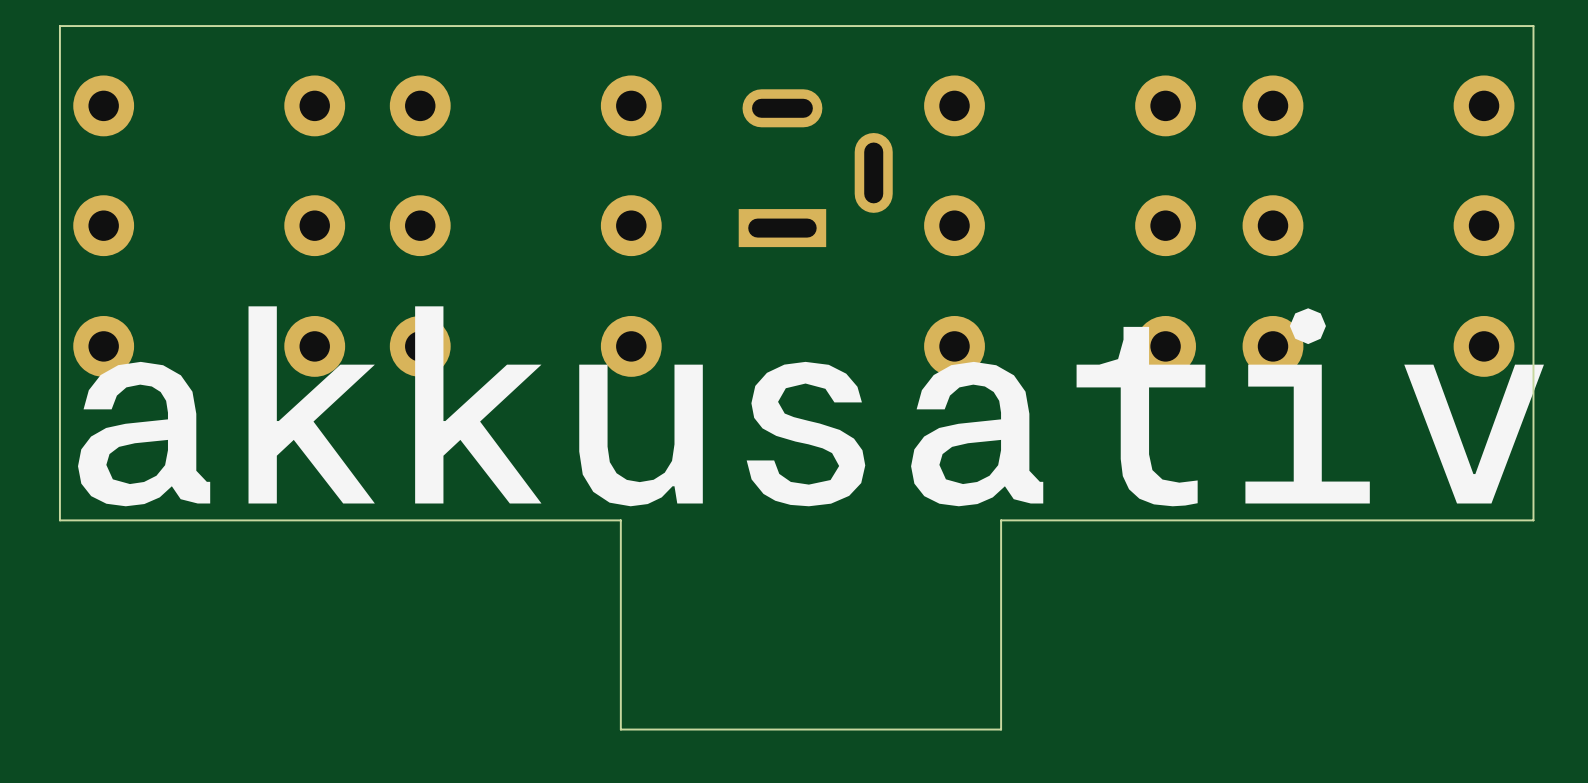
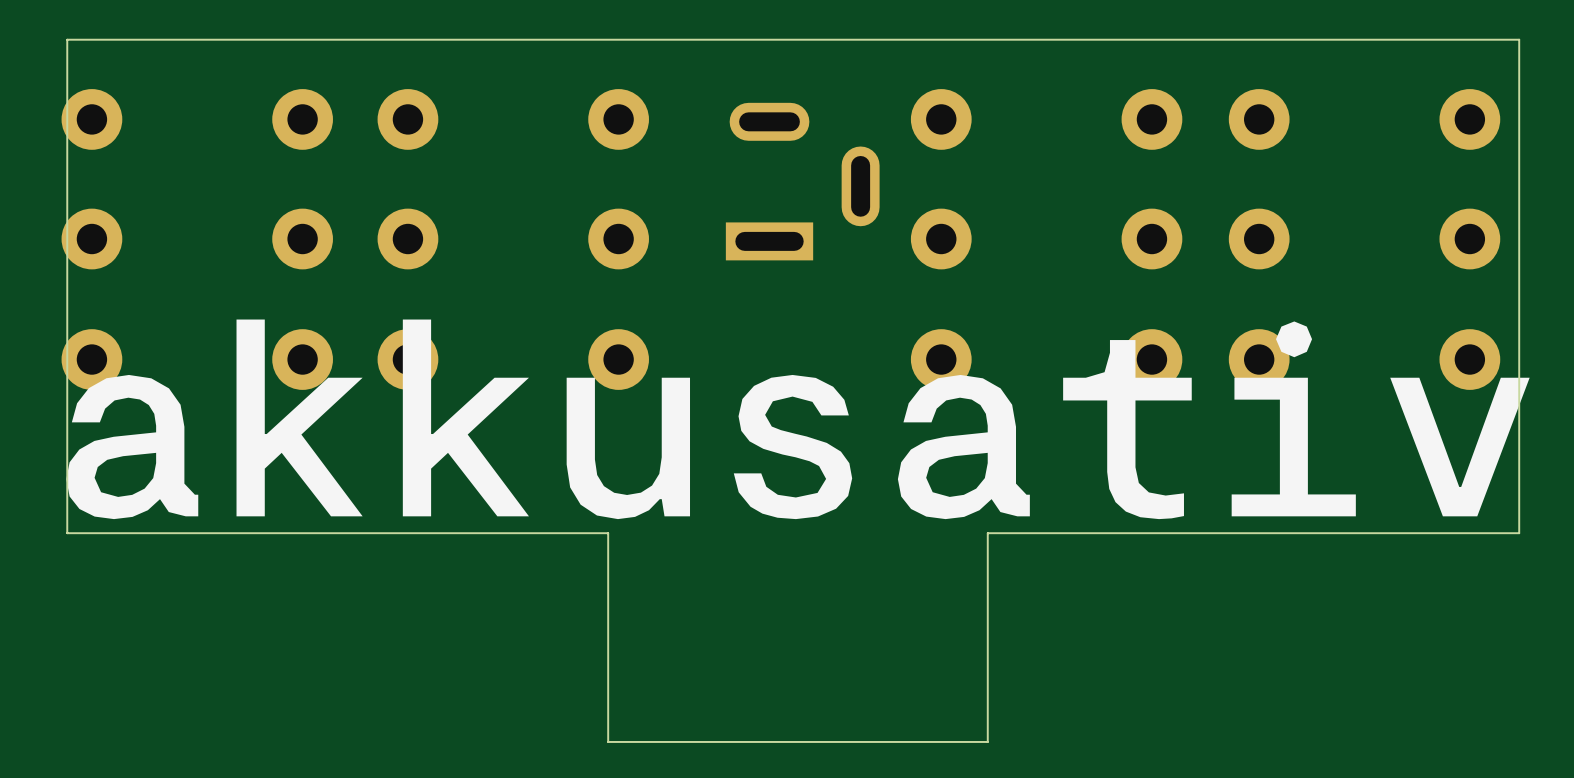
board edge: (78, 26) (59, 26) (59, 520) (78, 520) -> (67, 39) (67, 533)

